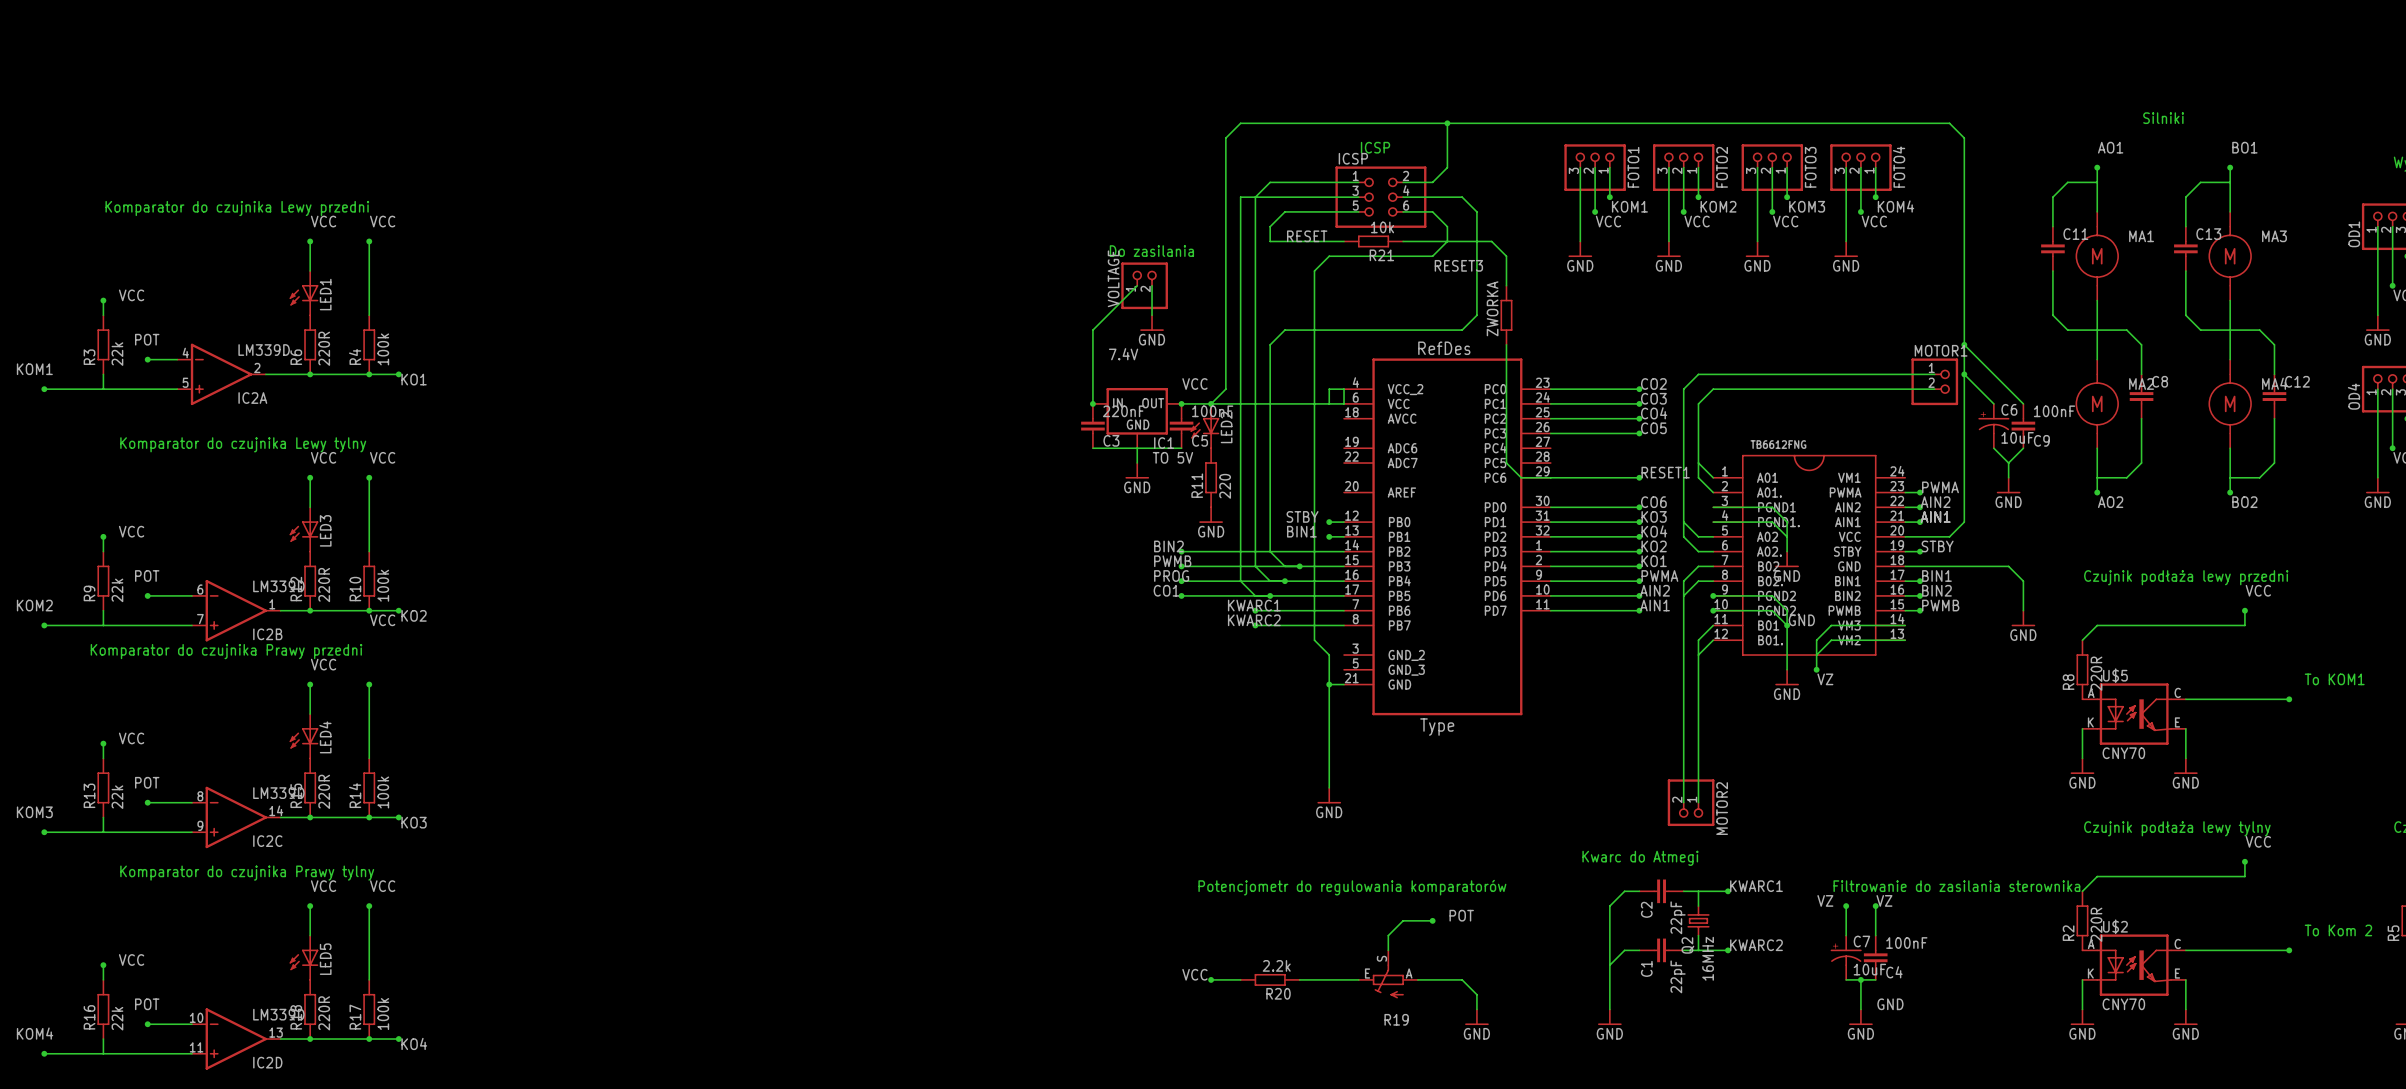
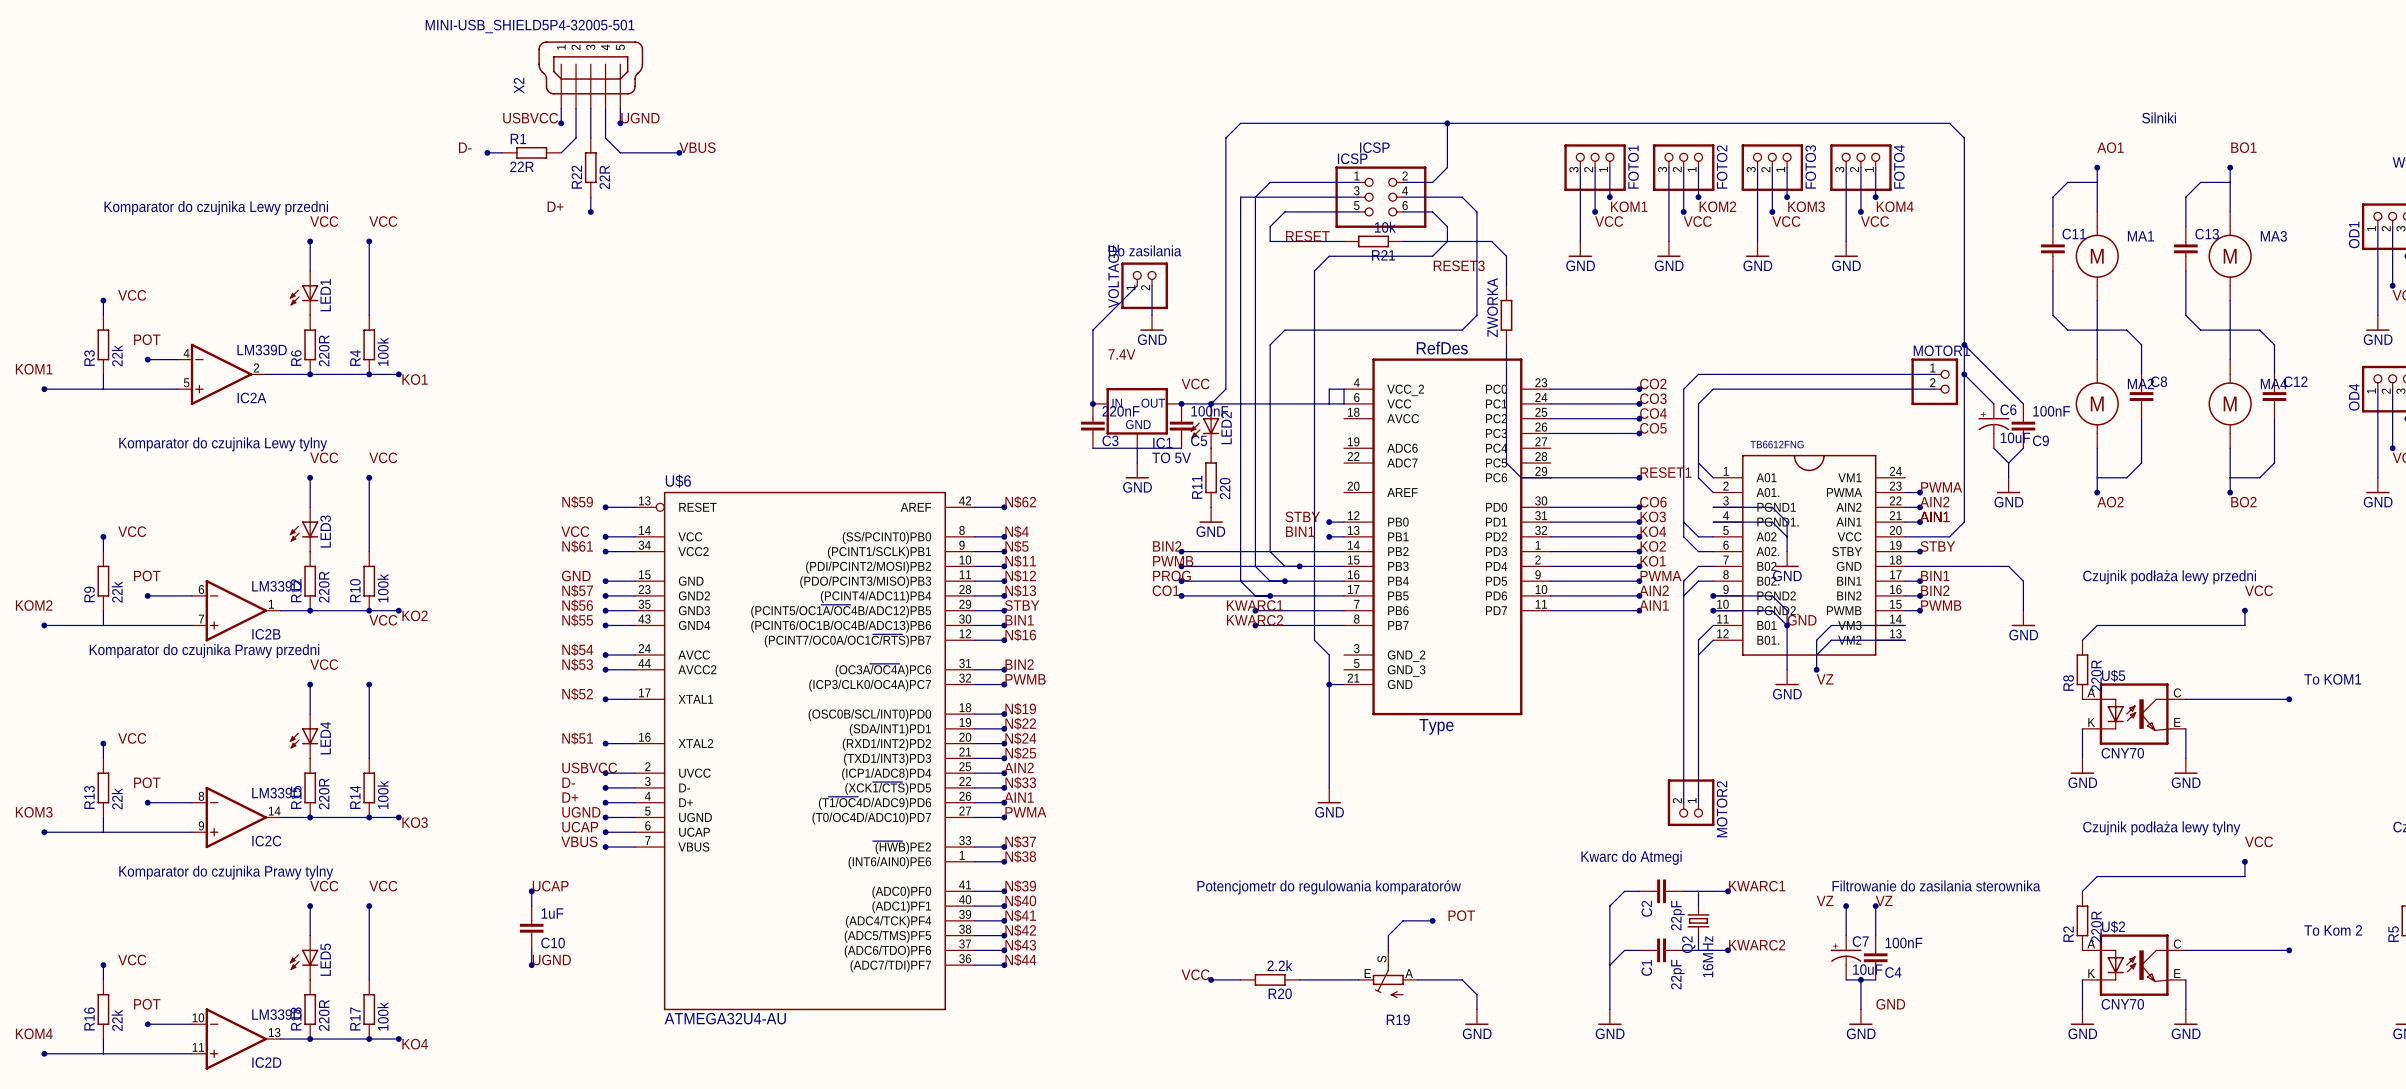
X2: none -> MINI-USB_SHIELD5P4-32005-501 (590, 74)
wire: none -> (561, 108) (561, 123)
wire: none -> (576, 108) (576, 138) (561, 152)
wire: none -> (590, 108) (590, 138)
wire: none -> (605, 108) (605, 138) (620, 152) (679, 152)
wire: none -> (620, 108) (620, 123)
label: none -> USBVCC (530, 118)
label: none -> UGND (640, 118)
junction: none -> (561, 123)
junction: none -> (620, 123)
label: none -> D- (465, 147)
label: none -> VBUS (697, 147)
wire: none -> (487, 152) (502, 152)
junction: none -> (487, 152)
R1: none -> 22R (531, 152)
junction: none -> (679, 152)
R22: none -> 22R (590, 167)
wire: none -> (590, 197) (590, 211)
label: none -> D+ (555, 206)
junction: none -> (590, 211)
label: none -> N$59 (577, 502)
label: none -> N$62 (1020, 502)
wire: none -> (605, 507) (635, 507)
junction: none -> (605, 507)
wire: none -> (974, 507) (1004, 507)
junction: none -> (1004, 507)
label: none -> VCC (575, 531)
label: none -> N$4 (1017, 531)
wire: none -> (605, 536) (635, 536)
junction: none -> (605, 536)
wire: none -> (974, 536) (1004, 536)
junction: none -> (1004, 536)
label: none -> N$61 (577, 546)
label: none -> N$5 (1017, 546)
wire: none -> (605, 551) (635, 551)
junction: none -> (605, 551)
wire: none -> (974, 551) (1004, 551)
junction: none -> (1004, 551)
label: none -> N$11 (1020, 561)
wire: none -> (974, 566) (1004, 566)
junction: none -> (1004, 566)
label: none -> GND (576, 575)
label: none -> N$12 (1020, 576)
wire: none -> (605, 581) (635, 581)
junction: none -> (605, 581)
wire: none -> (974, 581) (1004, 581)
junction: none -> (1004, 581)
label: none -> N$57 (577, 590)
label: none -> N$13 (1020, 590)
wire: none -> (605, 595) (635, 595)
junction: none -> (605, 595)
wire: none -> (974, 595) (1004, 595)
junction: none -> (1004, 595)
label: none -> N$56 (577, 605)
label: none -> STBY (1022, 605)
wire: none -> (605, 610) (635, 610)
junction: none -> (605, 610)
wire: none -> (974, 610) (1004, 610)
junction: none -> (1004, 610)
label: none -> N$55 (577, 620)
label: none -> BIN1 (1019, 620)
wire: none -> (605, 625) (635, 625)
junction: none -> (605, 625)
wire: none -> (974, 625) (1004, 625)
junction: none -> (1004, 625)
label: none -> N$16 (1020, 635)
wire: none -> (974, 640) (1004, 640)
junction: none -> (1004, 640)
label: none -> N$54 (577, 649)
wire: none -> (605, 655) (635, 655)
junction: none -> (605, 655)
label: none -> N$53 (577, 664)
label: none -> BIN2 (1019, 664)
wire: none -> (605, 669) (635, 669)
junction: none -> (605, 669)
wire: none -> (974, 669) (1004, 669)
junction: none -> (1004, 669)
label: none -> PWMB (1025, 679)
wire: none -> (974, 684) (1004, 684)
junction: none -> (1004, 684)
label: none -> N$52 (577, 694)
wire: none -> (605, 699) (635, 699)
junction: none -> (605, 699)
label: none -> N$19 (1020, 709)
wire: none -> (974, 714) (1004, 714)
junction: none -> (1004, 714)
label: none -> N$22 (1020, 723)
wire: none -> (974, 728) (1004, 728)
junction: none -> (1004, 728)
label: none -> N$51 (577, 738)
label: none -> N$24 (1020, 738)
wire: none -> (605, 743) (635, 743)
junction: none -> (605, 743)
wire: none -> (974, 743) (1004, 743)
junction: none -> (1004, 743)
U$6: none -> ATMEGA32U4-AU (804, 751)
label: none -> N$25 (1020, 753)
wire: none -> (974, 758) (1004, 758)
junction: none -> (1004, 758)
label: none -> USBVCC (589, 767)
label: none -> AIN2 (1019, 767)
wire: none -> (605, 773) (635, 773)
junction: none -> (605, 773)
wire: none -> (974, 773) (1004, 773)
junction: none -> (1004, 773)
label: none -> D- (568, 782)
label: none -> N$33 (1020, 782)
wire: none -> (605, 787) (635, 787)
junction: none -> (605, 787)
wire: none -> (974, 787) (1004, 787)
junction: none -> (1004, 787)
label: none -> D+ (570, 797)
label: none -> AIN1 (1019, 797)
wire: none -> (605, 802) (635, 802)
junction: none -> (605, 802)
wire: none -> (974, 802) (1004, 802)
junction: none -> (1004, 802)
label: none -> UGND (581, 812)
label: none -> PWMA (1025, 812)
wire: none -> (605, 817) (635, 817)
junction: none -> (605, 817)
wire: none -> (974, 817) (1004, 817)
junction: none -> (1004, 817)
label: none -> UCAP (580, 827)
wire: none -> (605, 832) (635, 832)
junction: none -> (605, 832)
label: none -> VBUS (579, 841)
label: none -> N$37 (1020, 841)
wire: none -> (605, 847) (635, 847)
junction: none -> (605, 847)
wire: none -> (974, 847) (1004, 847)
junction: none -> (1004, 847)
label: none -> N$38 (1020, 856)
wire: none -> (974, 861) (1004, 861)
junction: none -> (1004, 861)
label: none -> UCAP (550, 886)
label: none -> N$39 (1020, 886)
wire: none -> (531, 891) (531, 906)
junction: none -> (531, 891)
wire: none -> (974, 891) (1004, 891)
junction: none -> (1004, 891)
label: none -> N$40 (1020, 901)
wire: none -> (974, 906) (1004, 906)
junction: none -> (1004, 906)
label: none -> N$41 (1020, 915)
wire: none -> (974, 920) (1004, 920)
junction: none -> (1004, 920)
C10: none -> 1uF (531, 928)
label: none -> N$42 (1020, 930)
wire: none -> (974, 935) (1004, 935)
junction: none -> (1004, 935)
label: none -> N$43 (1020, 945)
wire: none -> (531, 950) (531, 965)
wire: none -> (974, 950) (1004, 950)
junction: none -> (1004, 950)
label: none -> UGND (551, 959)
label: none -> N$44 (1020, 960)
junction: none -> (531, 965)
wire: none -> (974, 965) (1004, 965)
junction: none -> (1004, 965)

